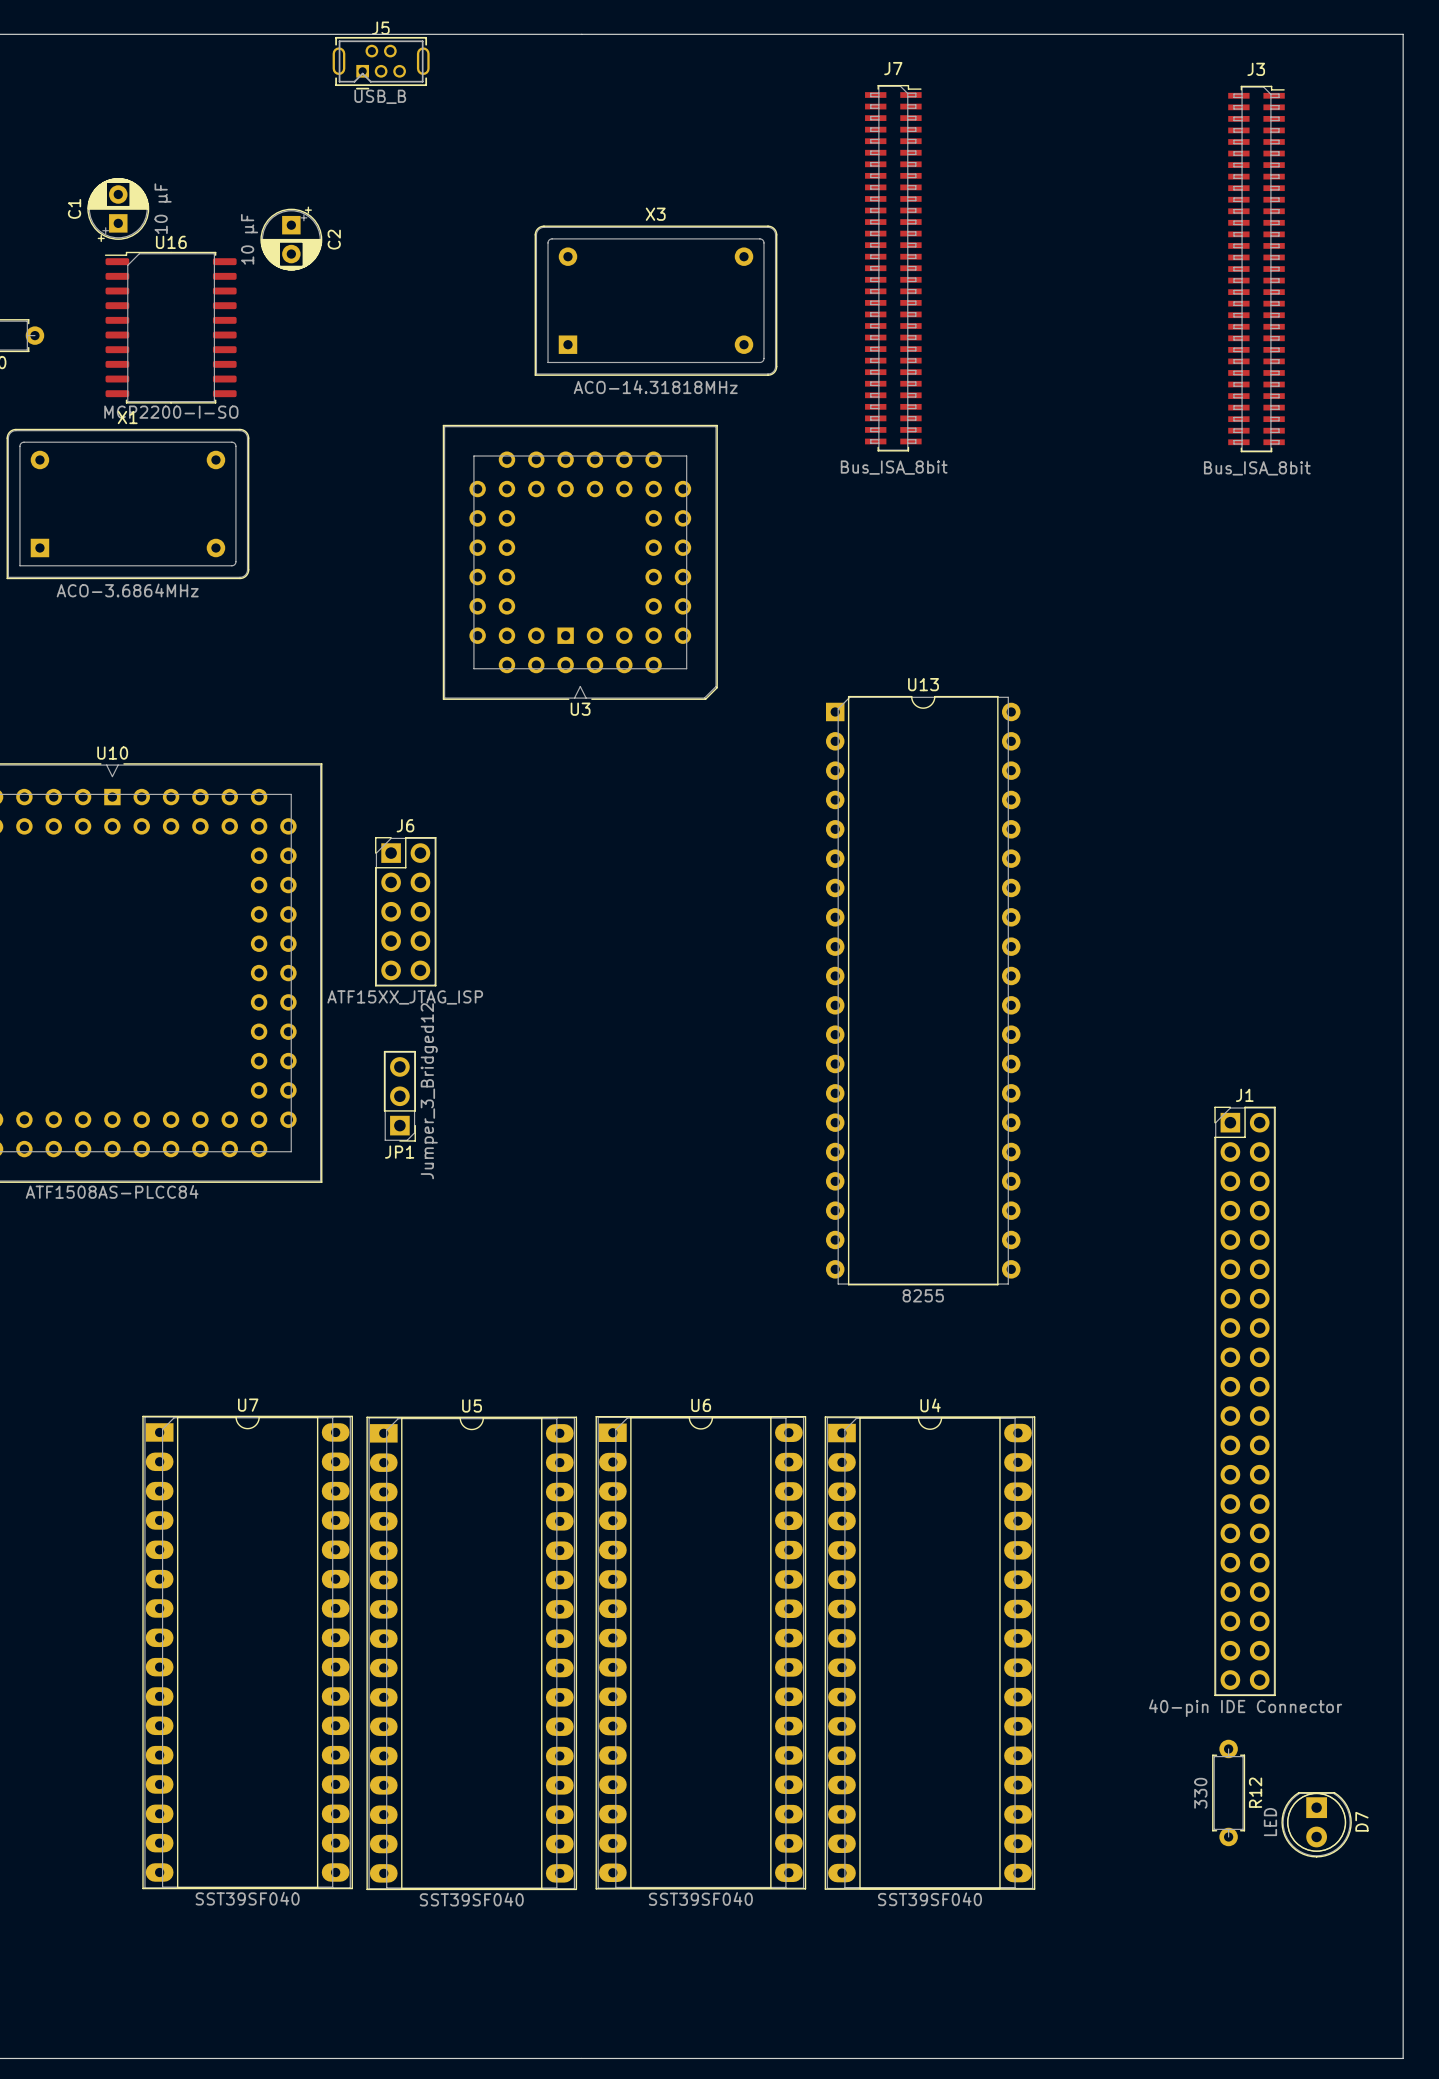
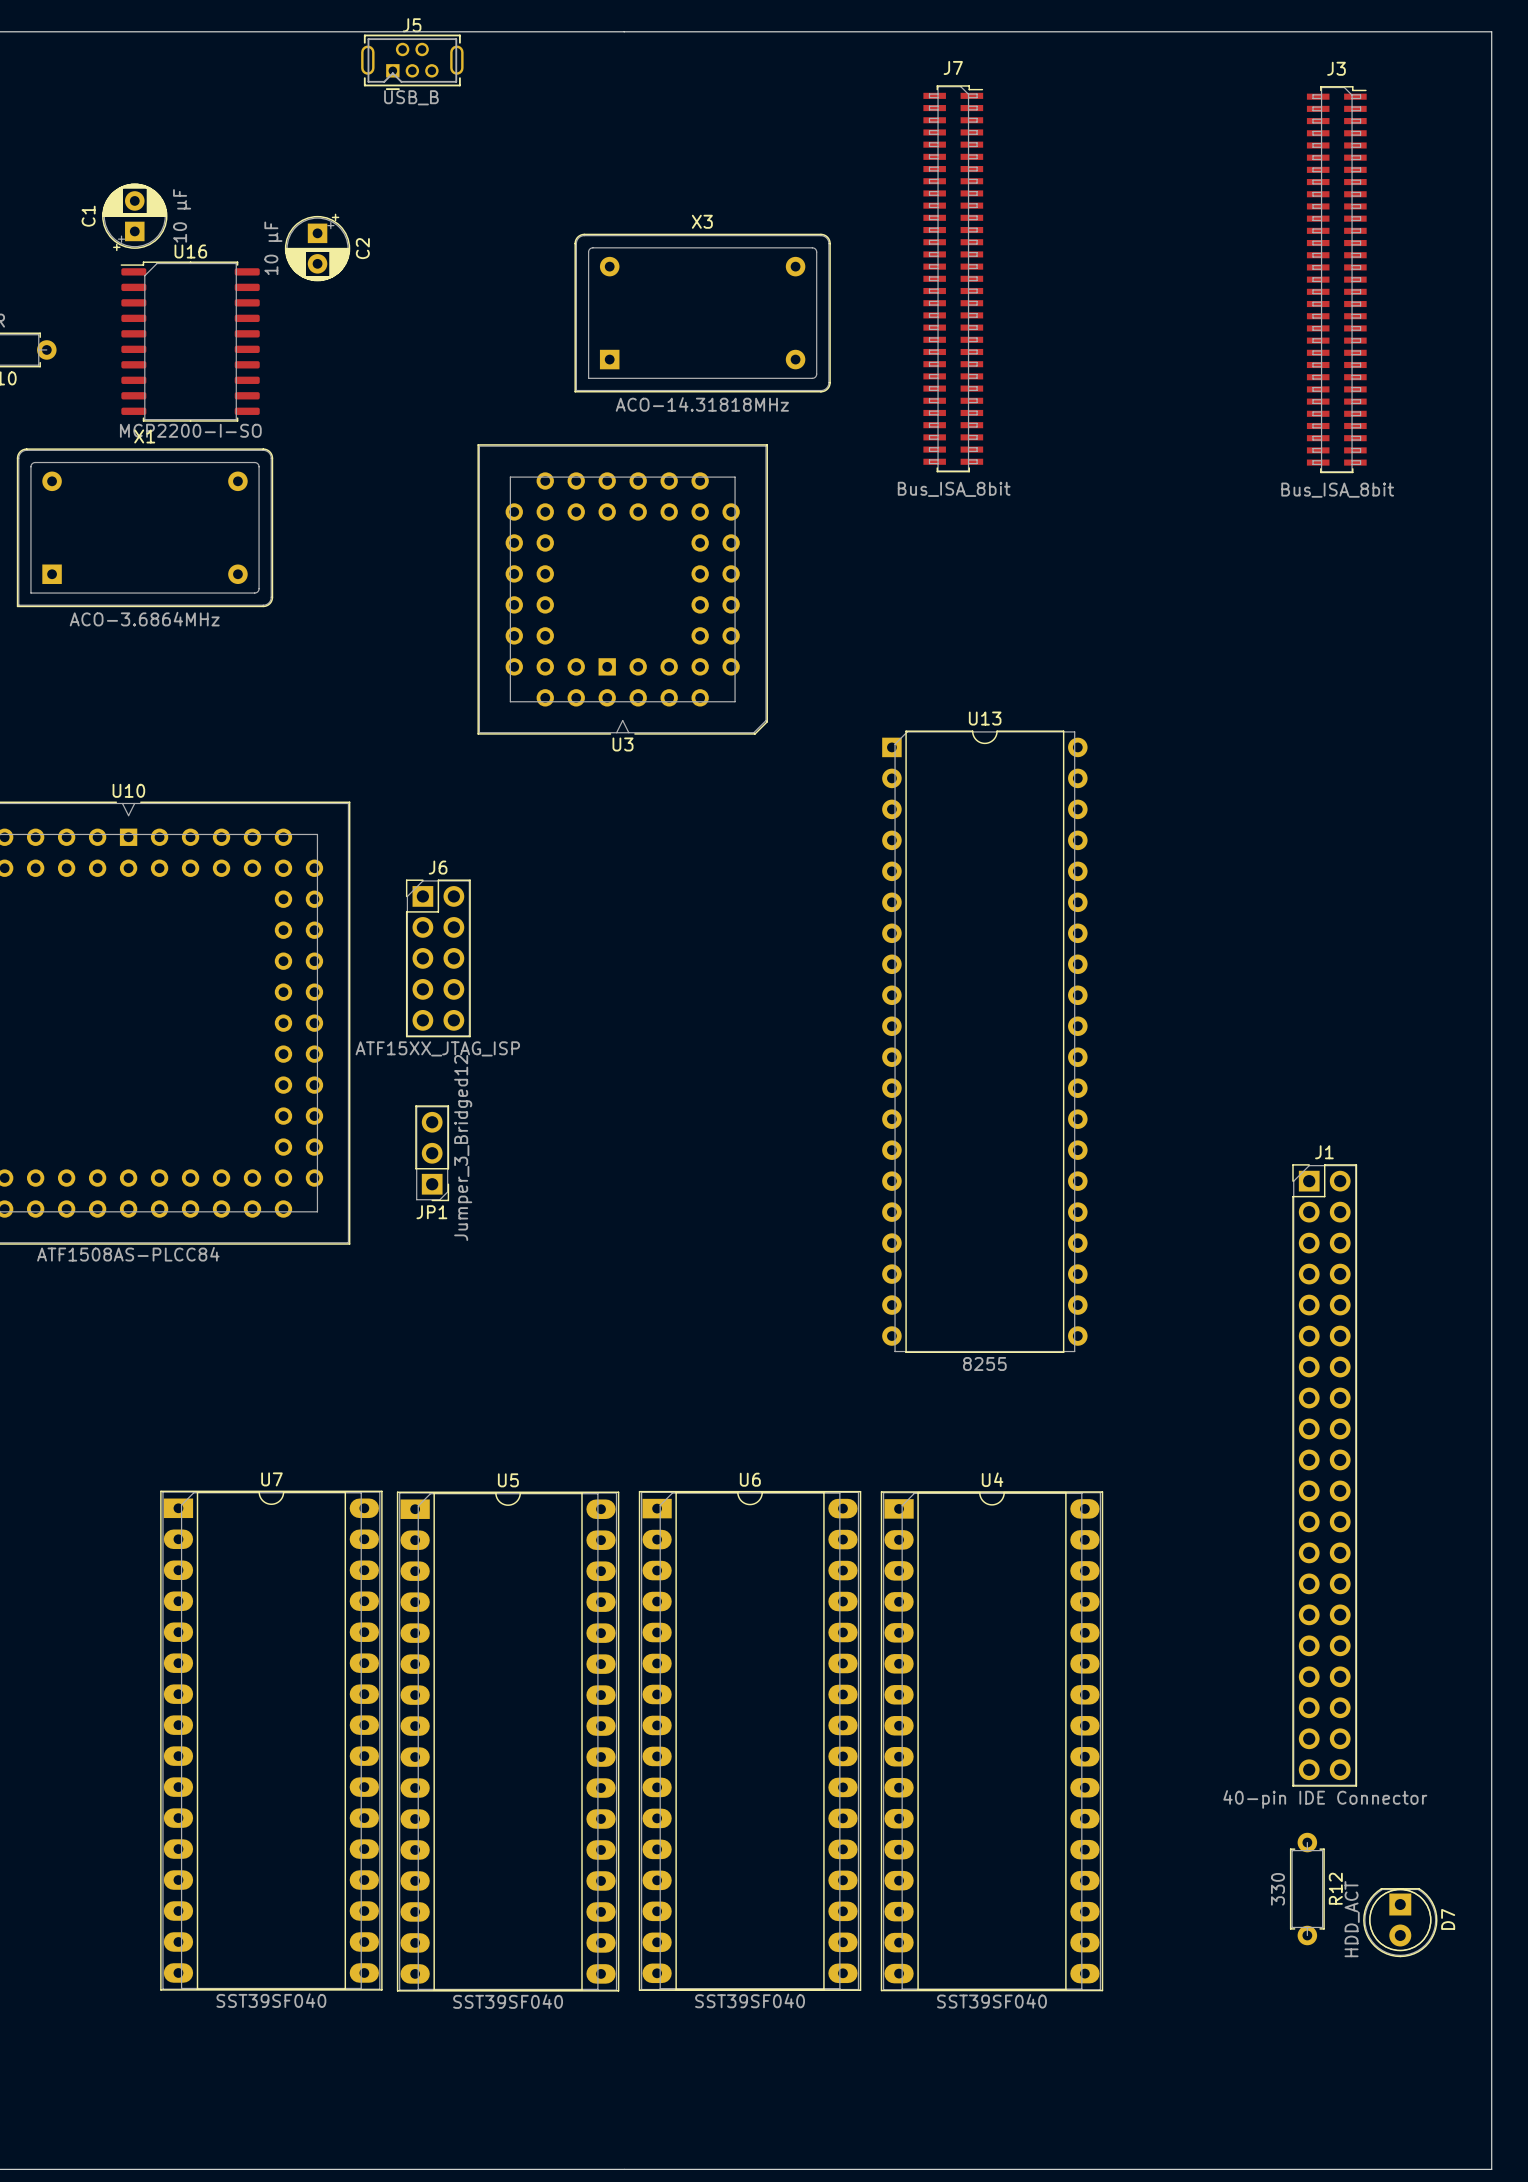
D7 value: LED (1270, 1822) -> HDD_ACT (1352, 1919)

